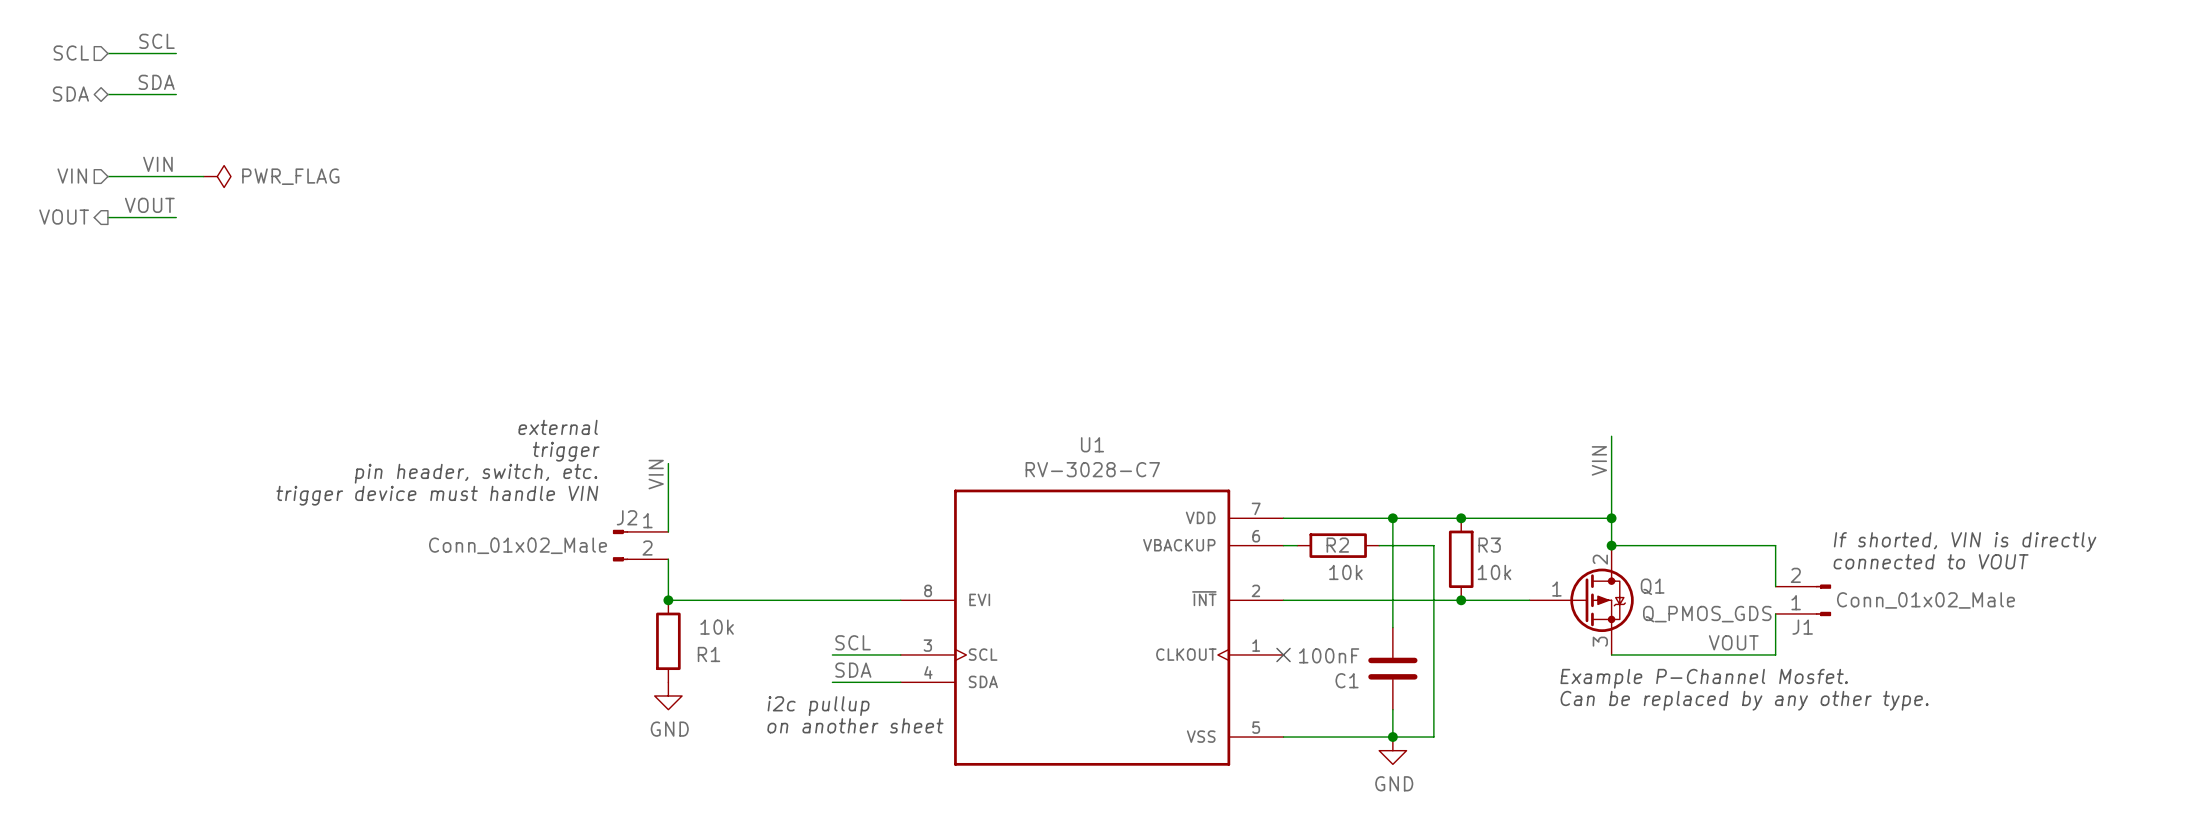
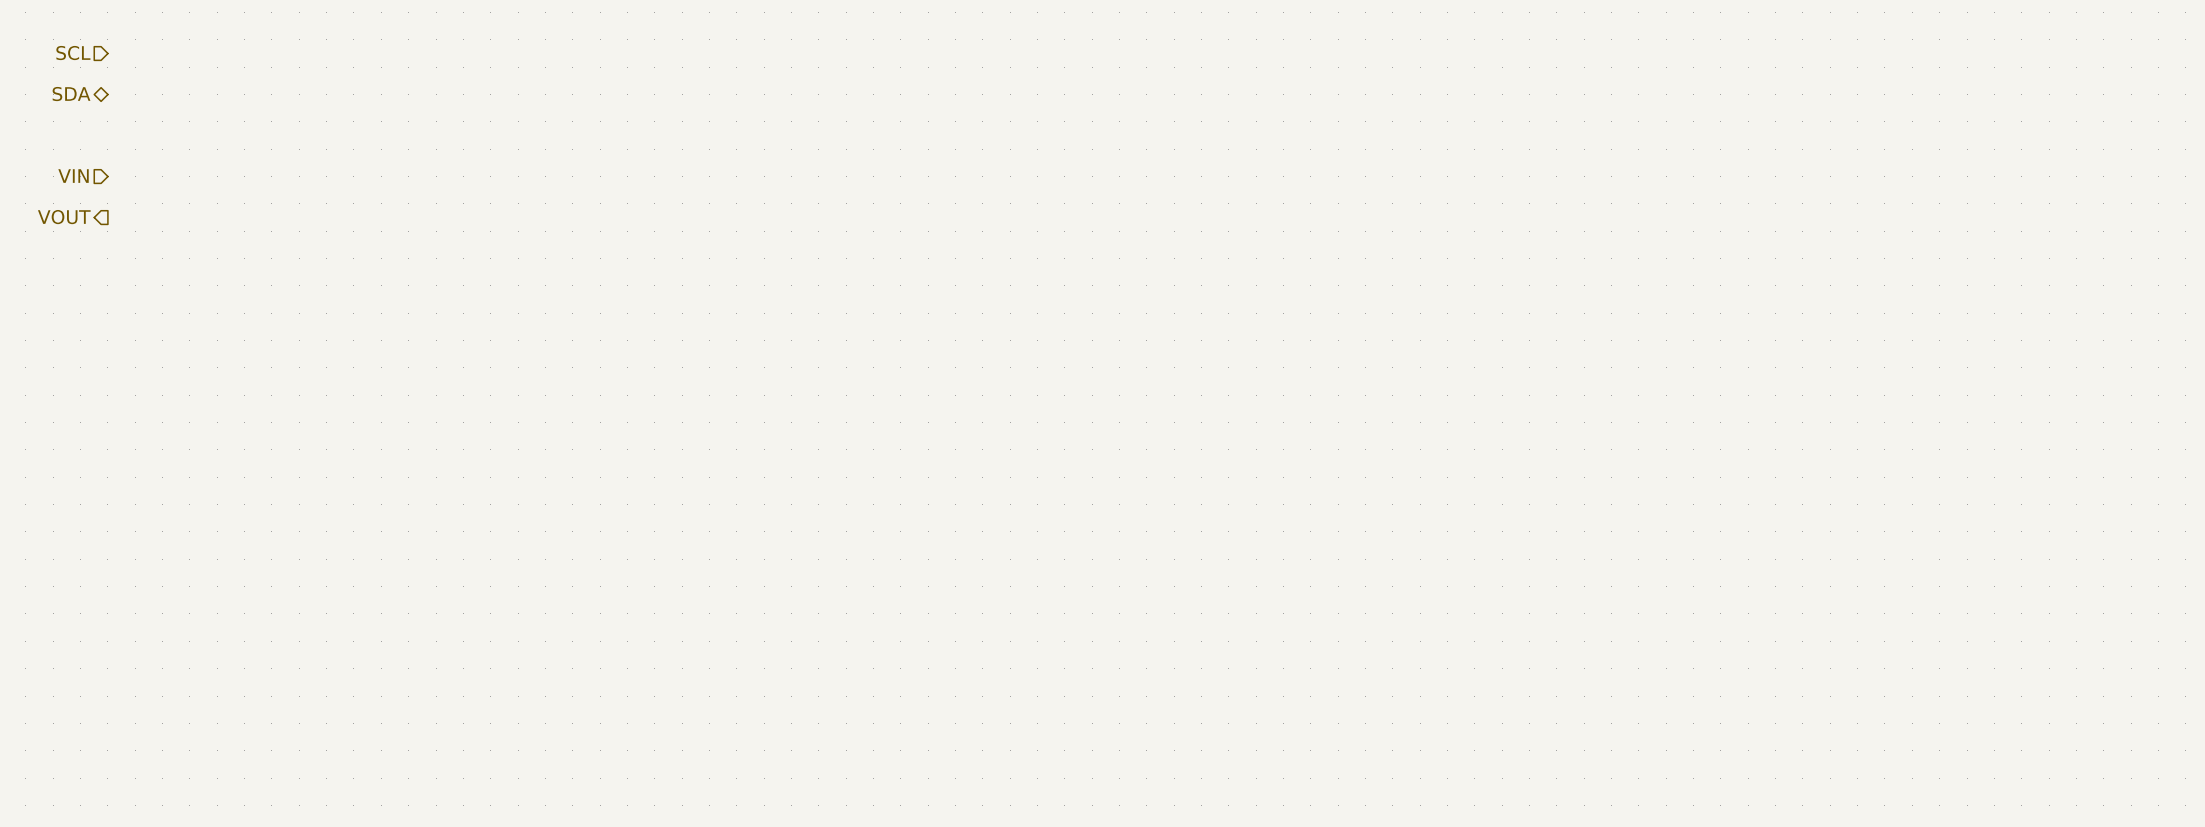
label: SCL (156, 41) -> none
wire: (107, 53) (176, 53) -> none
label: SDA (156, 82) -> none
wire: (107, 94) (176, 94) -> none
label: VIN (157, 164) -> none
wire: (107, 176) (203, 176) -> none
power symbol: PWR_FLAG (217, 176) -> none
label: VOUT (149, 205) -> none
wire: (107, 217) (176, 217) -> none
text: external (558, 427) -> none
wire: (1611, 436) (1611, 545) (1775, 545) (1775, 586) -> none
text: trigger (566, 451) -> none
label: VIN (1599, 460) -> none
wire: (668, 463) (668, 531) -> none
text: pin header, switch, etc. (476, 473) -> none
label: VIN (656, 474) -> none
text: trigger device must handle VIN (437, 495) -> none
wire: (1283, 518) (1611, 518) -> none
wire: (1392, 518) (1392, 627) -> none
junction: (1392, 518) -> none
junction: (1461, 518) -> none
junction: (1611, 518) -> none
text: If shorted, VIN is directly (1965, 542) -> none
J2: Conn_01x02_Male (640, 545) -> none
wire: (1283, 545) (1297, 545) -> none
R2: 10k (1338, 545) -> none
wire: (1379, 545) (1433, 545) (1433, 737) (1283, 737) -> none
junction: (1611, 545) -> none
wire: (668, 559) (668, 600) (900, 600) -> none
R3: 10k (1461, 559) -> none
text: connected to VOUT (1931, 561) -> none
junction: (668, 600) -> none
wire: (1283, 600) (1529, 600) -> none
junction: (1461, 600) -> none
Q1: Q_PMOS_GDS (1581, 600) -> none
J1: Conn_01x02_Male (1803, 600) -> none
wire: (1775, 613) (1775, 654) (1611, 654) -> none
U1: RV-3028-C7 (1092, 627) -> none
R1: 10k (668, 641) -> none
label: SCL (853, 642) -> none
label: VOUT (1733, 642) -> none
wire: (832, 654) (900, 654) -> none
no-connect mark: (1283, 654) -> none
C1: 100nF (1392, 668) -> none
label: SDA (853, 670) -> none
text: Example P-Channel Mosfet. (1704, 678) -> none
wire: (832, 682) (900, 682) -> none
power symbol: GND (668, 696) -> none
text: Can be replaced by any other type. (1744, 700) -> none
text: i2c pullup (818, 706) -> none
wire: (1392, 709) (1392, 737) -> none
text: on another sheet (855, 725) -> none
junction: (1392, 737) -> none
power symbol: GND (1392, 750) -> none

